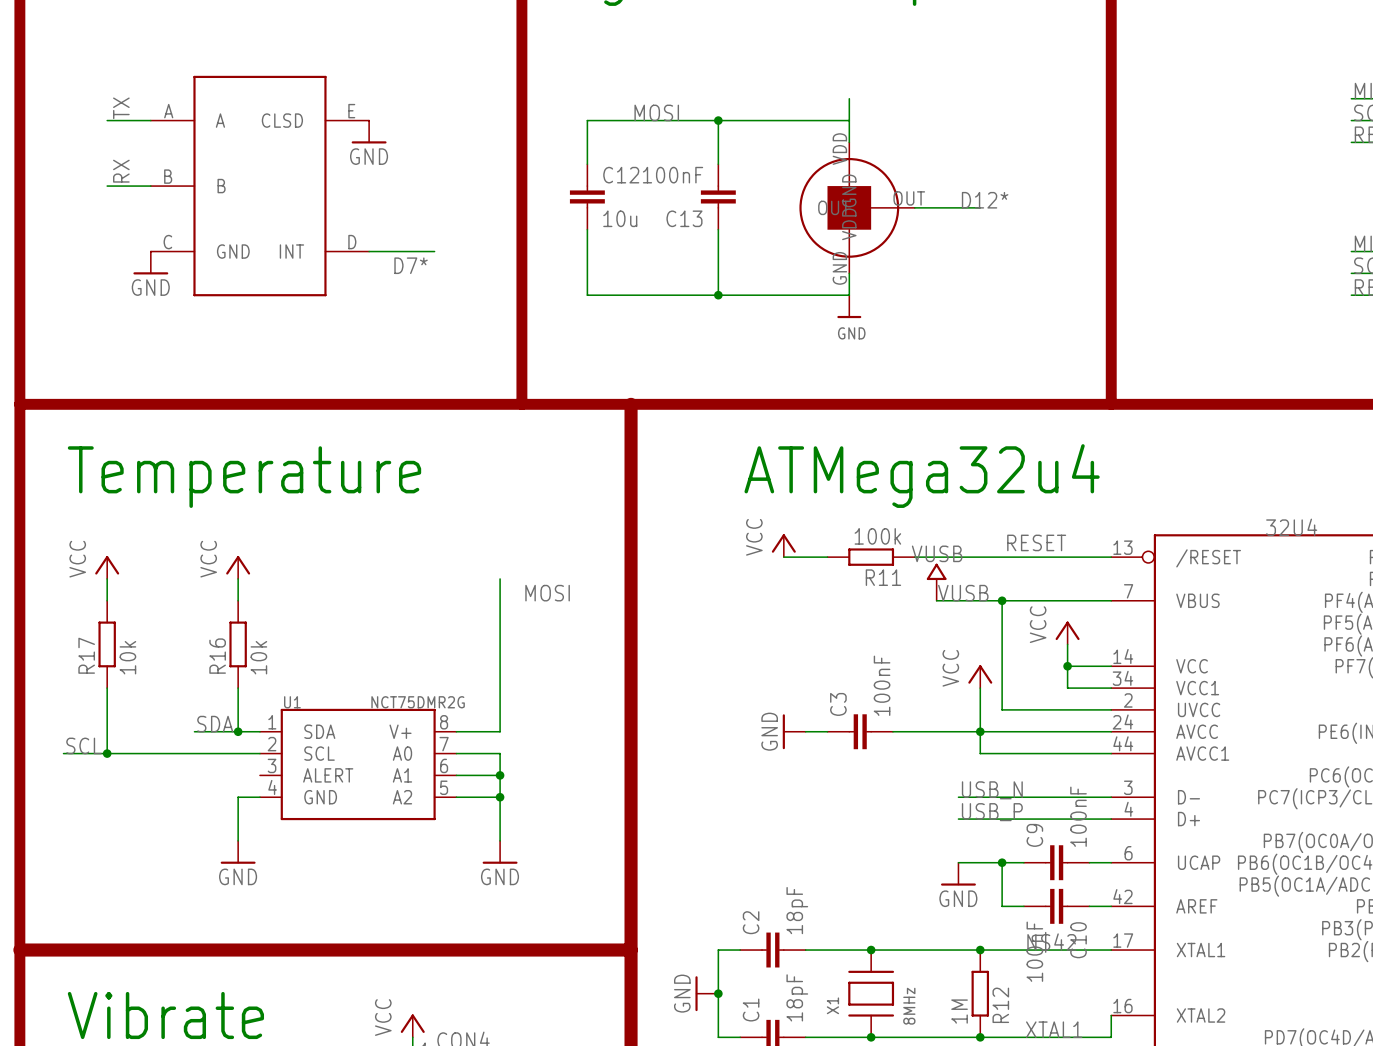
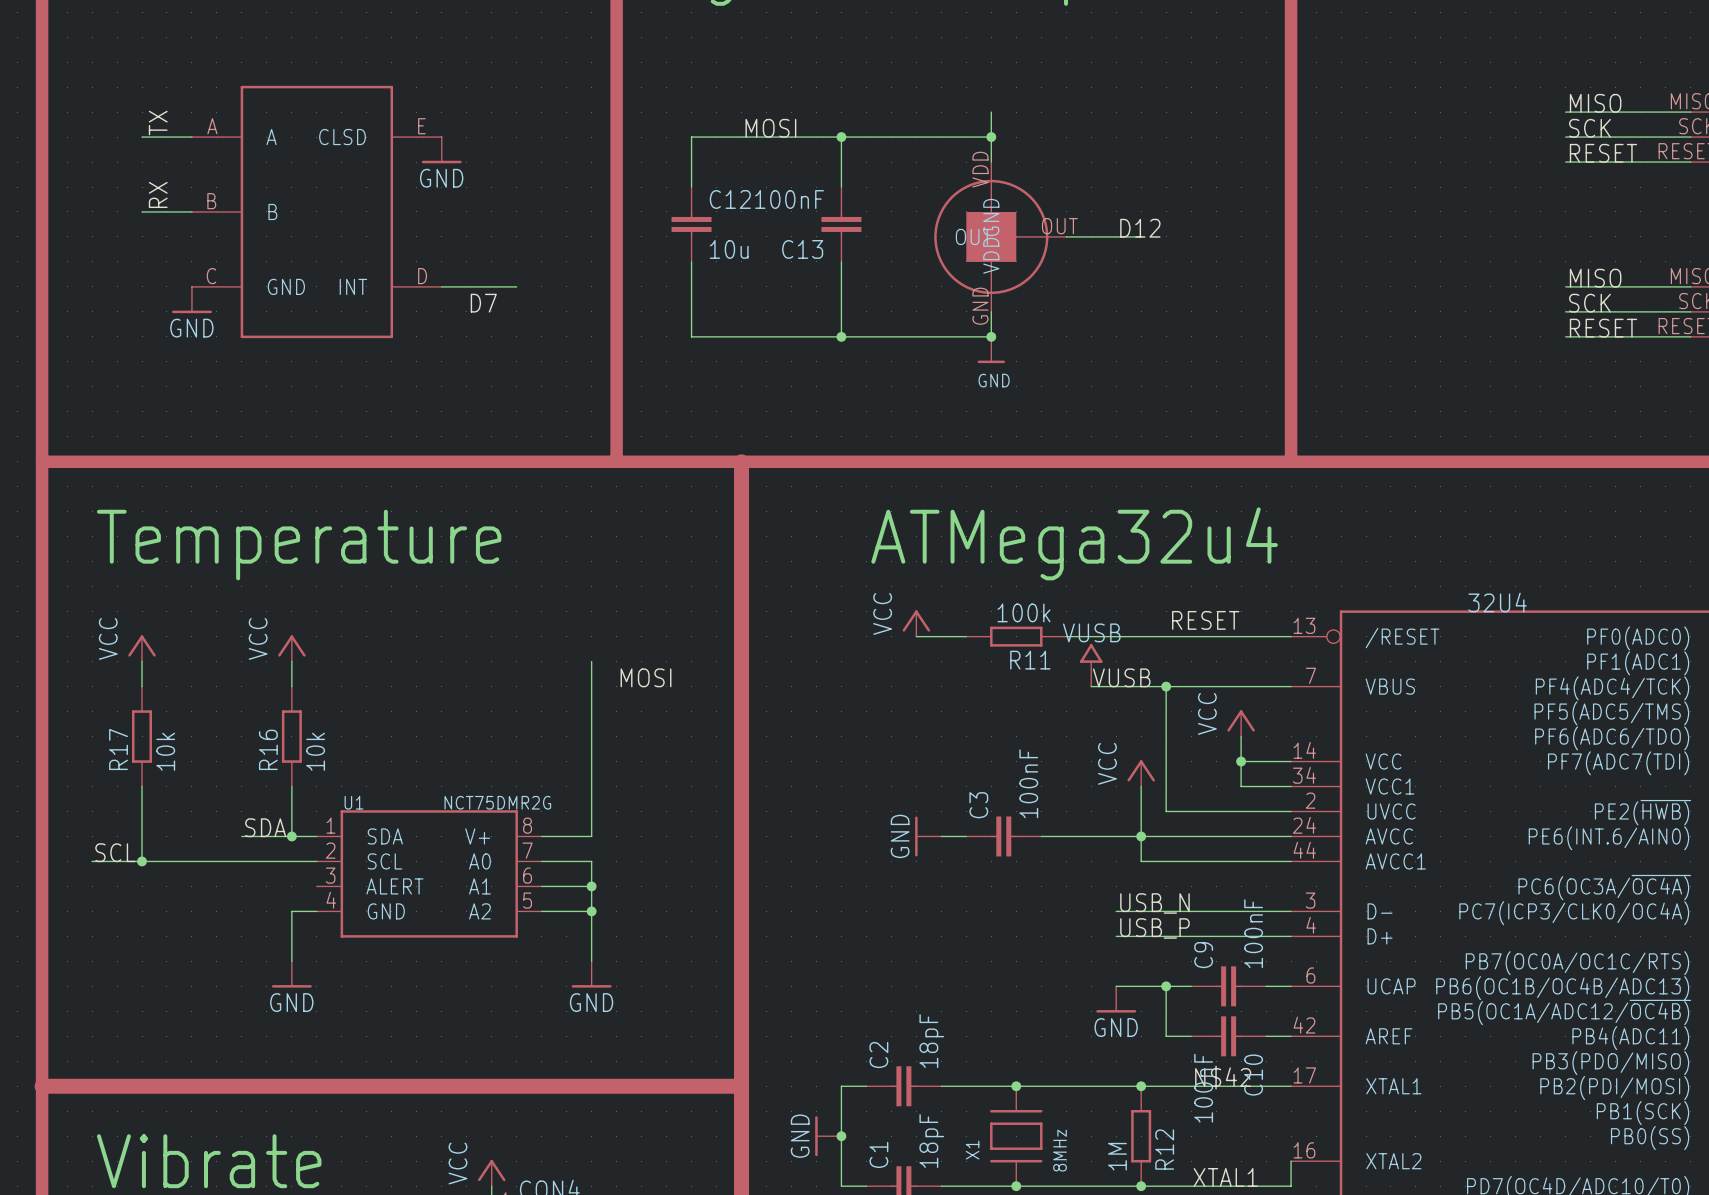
junction: none -> (991, 137)
label: D12* (985, 200) -> D12 (1140, 228)
label: D7* (411, 265) -> D7 (483, 303)
junction: none -> (991, 336)

